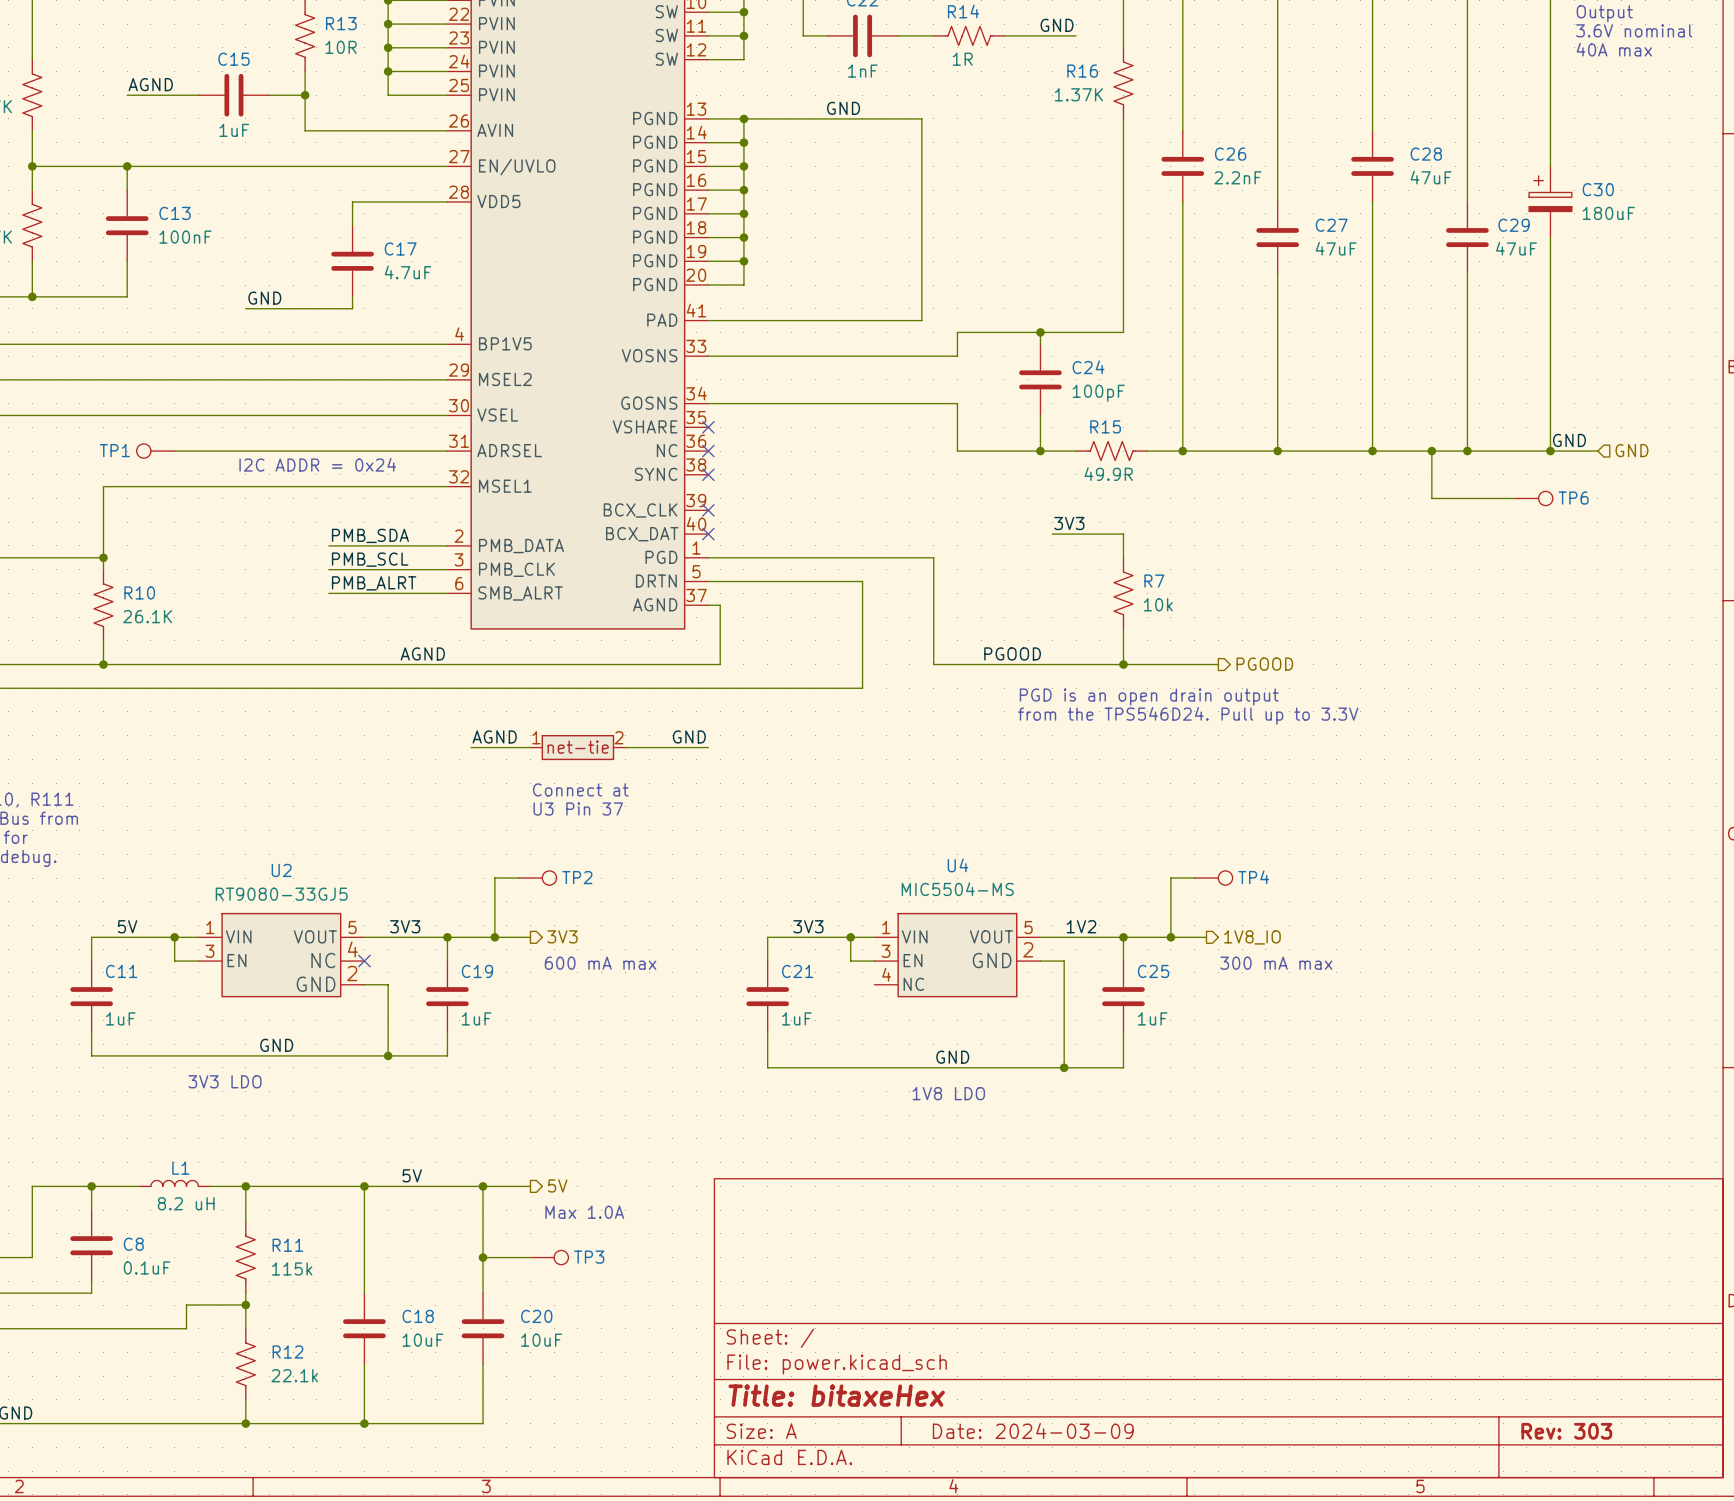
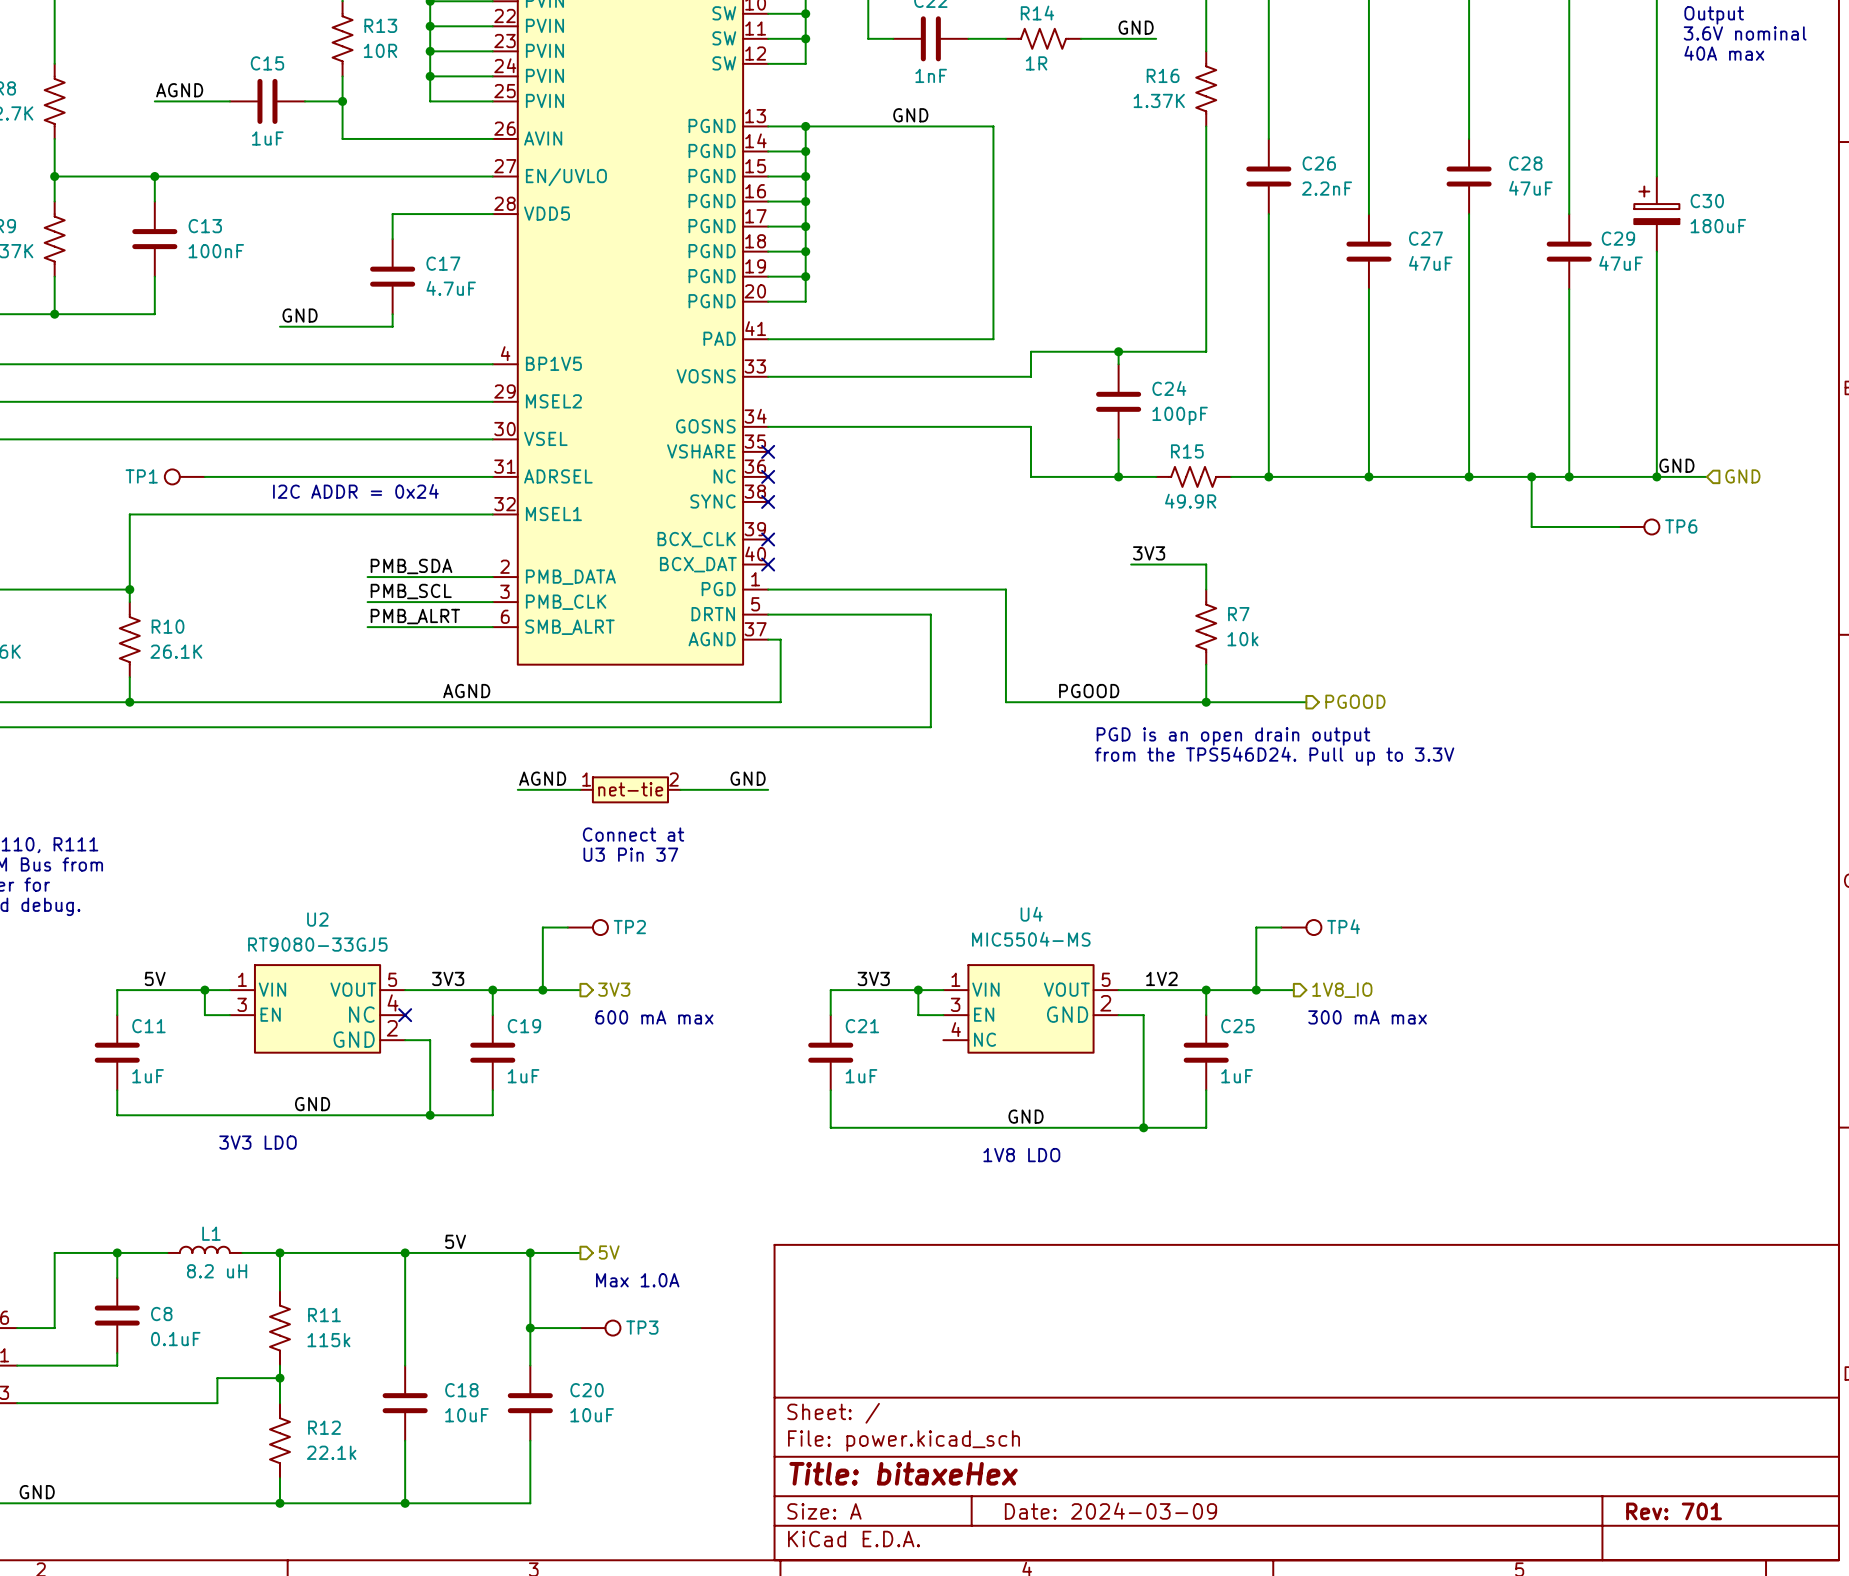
title block: Rev: 303 (1566, 1431) -> Rev: 701 (1674, 1511)

